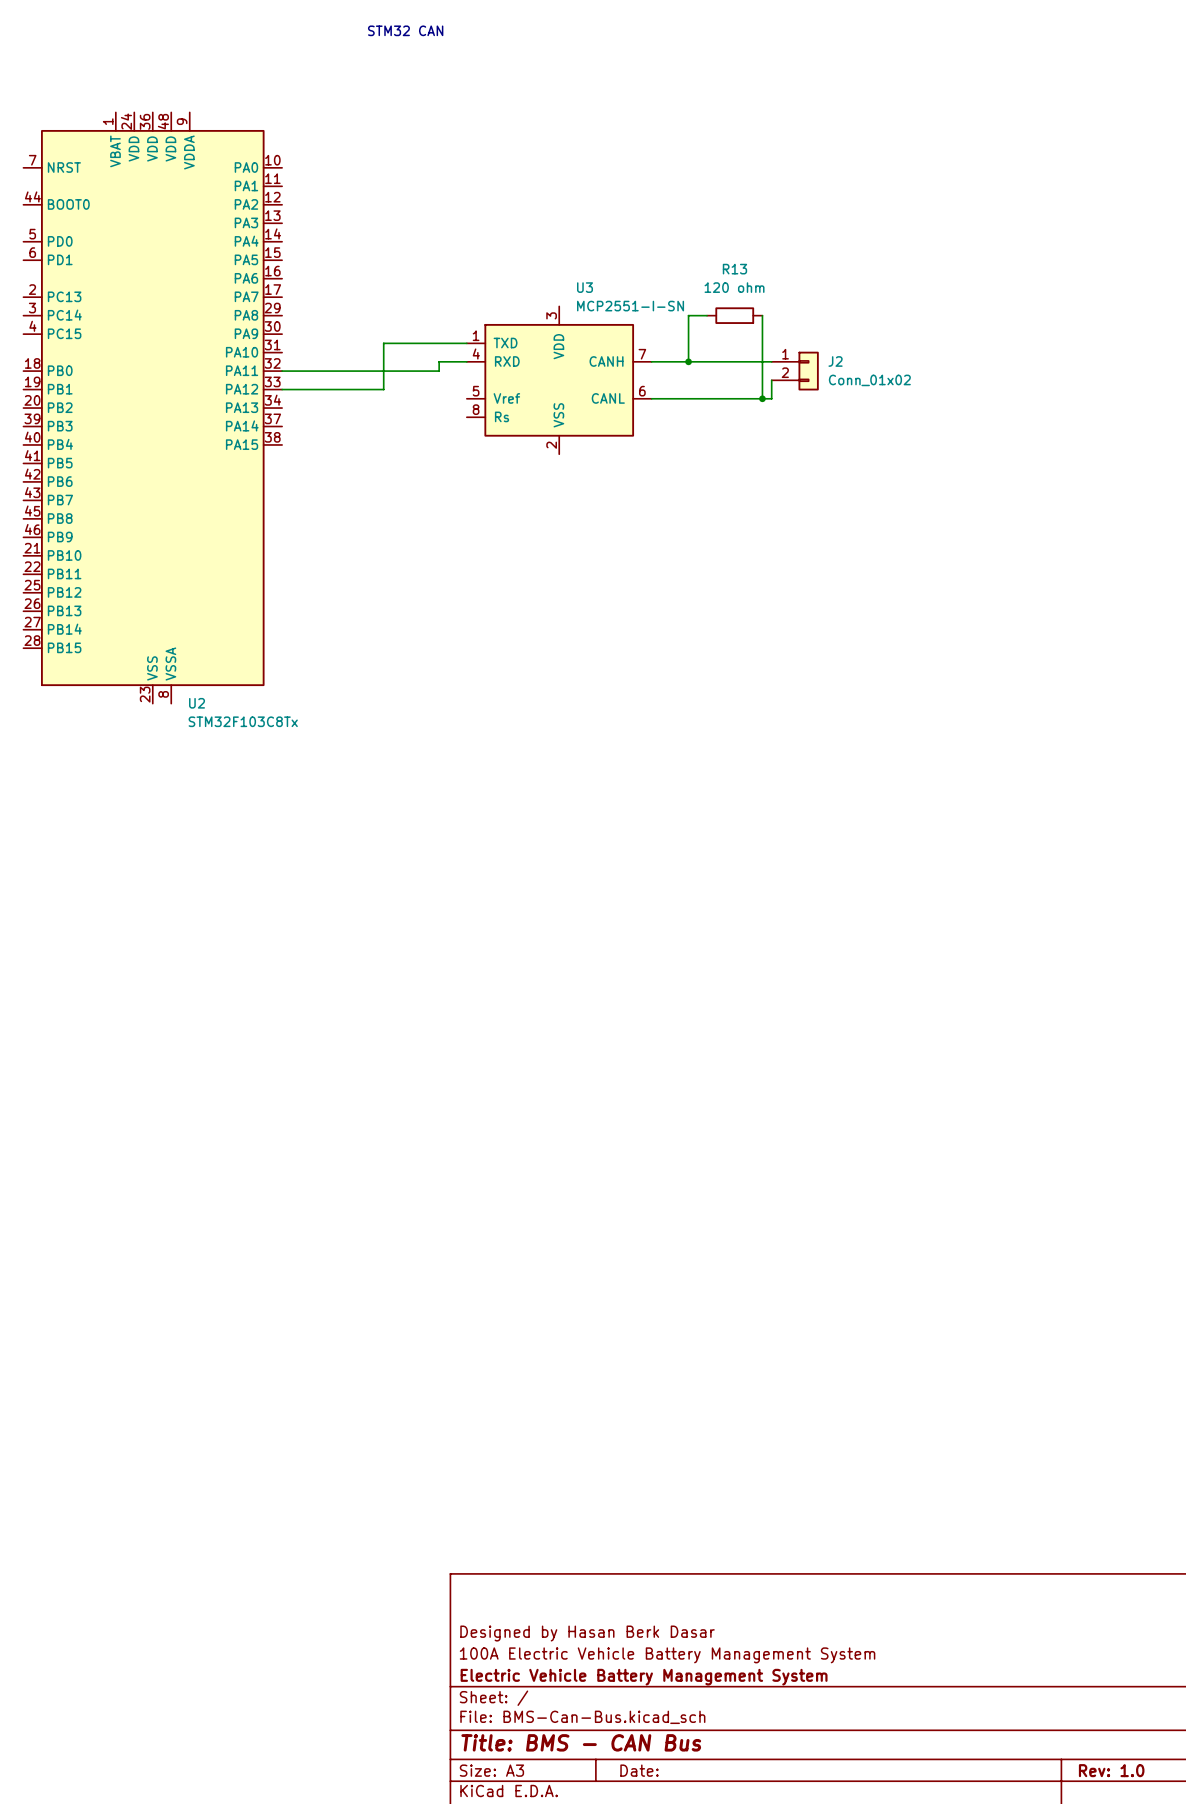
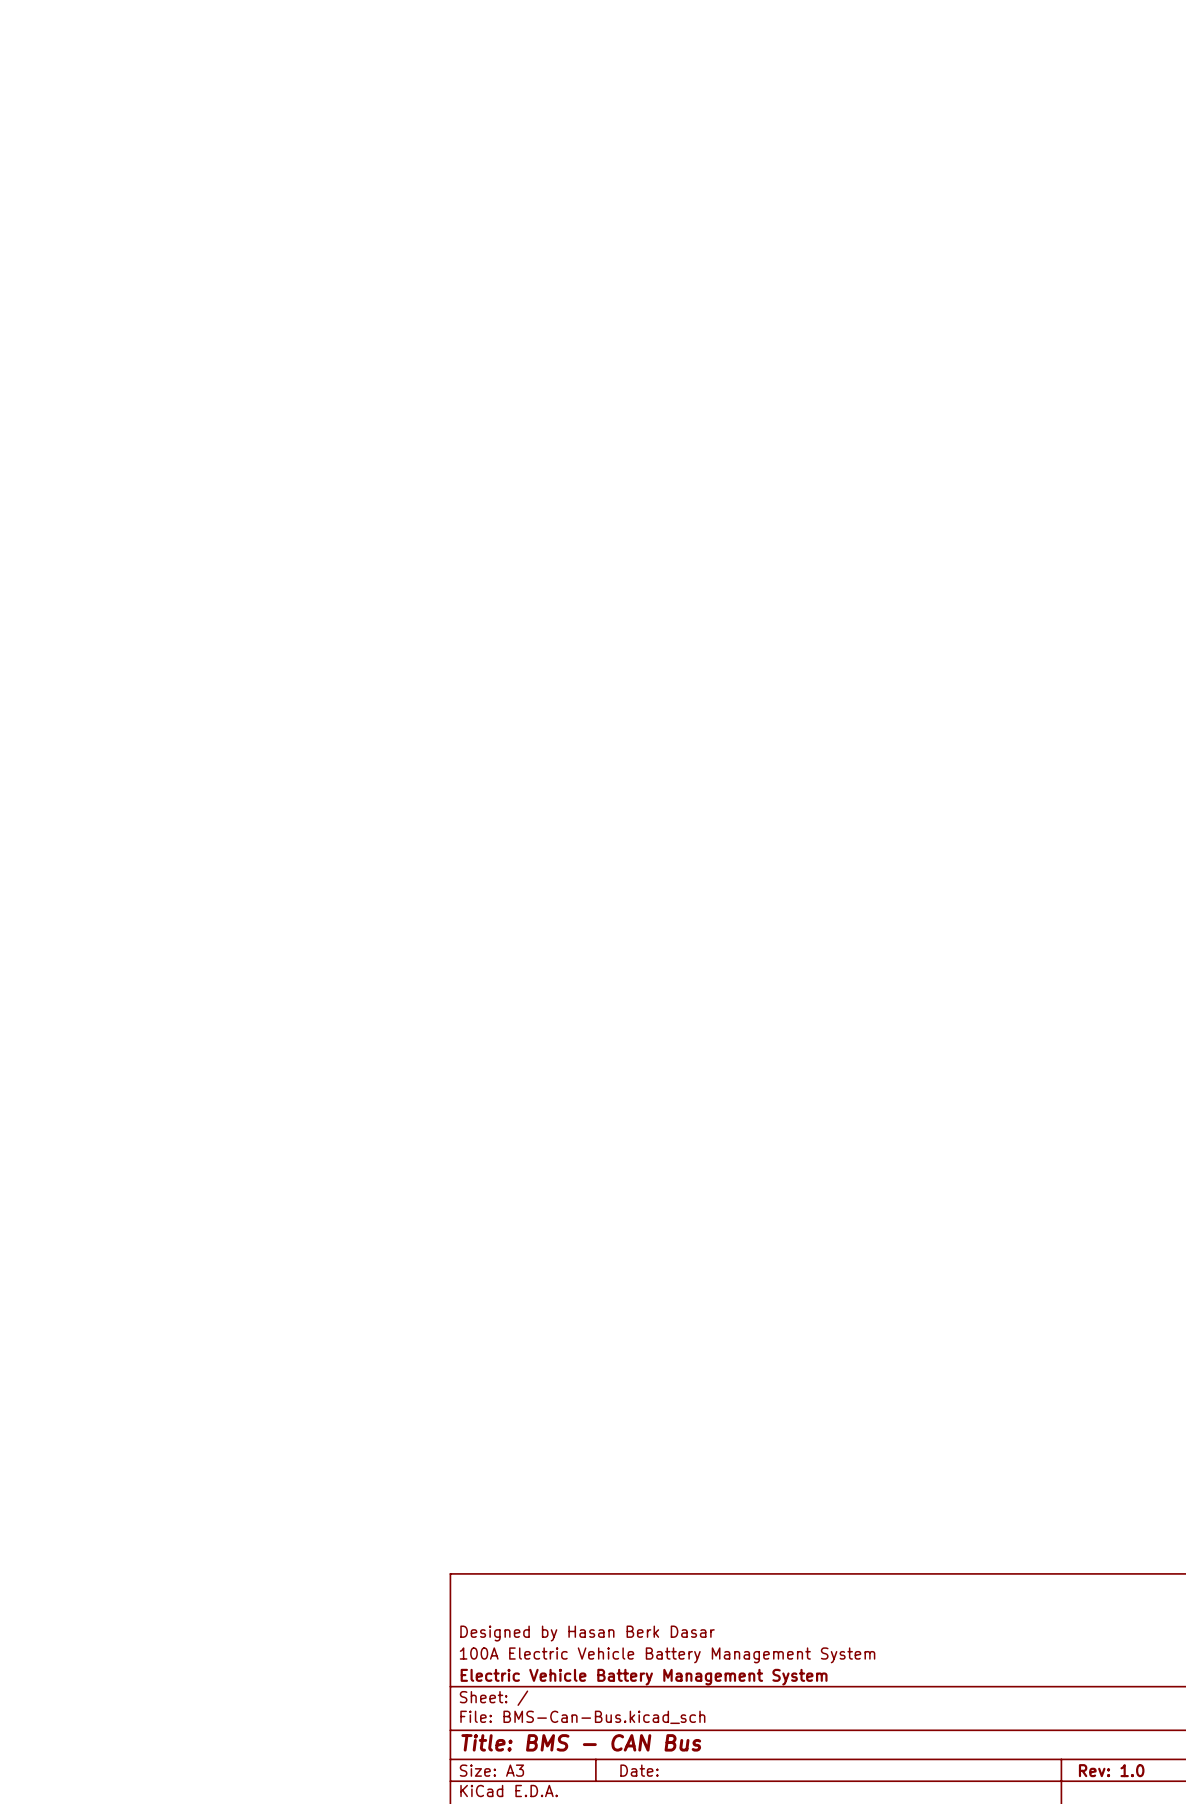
text: STM32 CAN (405, 30) -> none
wire: (707, 315) (688, 315) (688, 361) -> none
R13: 120 ohm (734, 315) -> none
wire: (762, 315) (762, 398) -> none
wire: (466, 343) (383, 343) (383, 389) (282, 389) -> none
wire: (466, 361) (439, 361) (439, 371) (282, 371) -> none
wire: (651, 361) (771, 361) -> none
junction: (688, 361) -> none
J2: Conn_01x02 (795, 371) -> none
U3: MCP2551-I-SN (559, 380) -> none
wire: (771, 380) (771, 398) (651, 398) -> none
junction: (762, 398) -> none
U2: STM32F103C8Tx (152, 408) -> none

